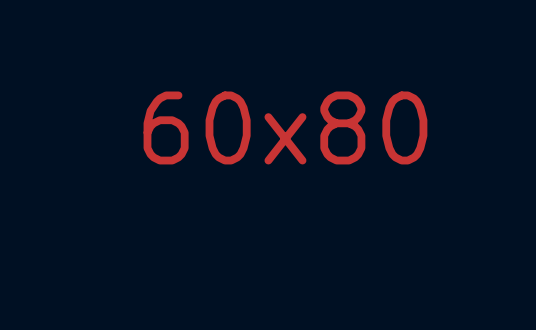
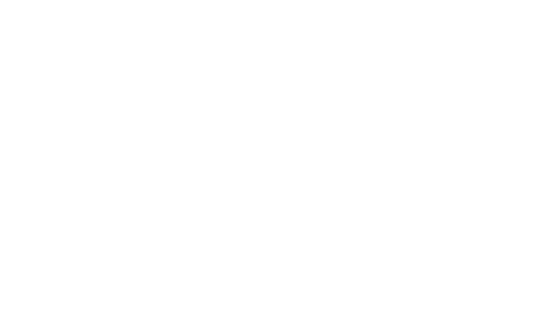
text: 60x80 (285, 127) -> none

